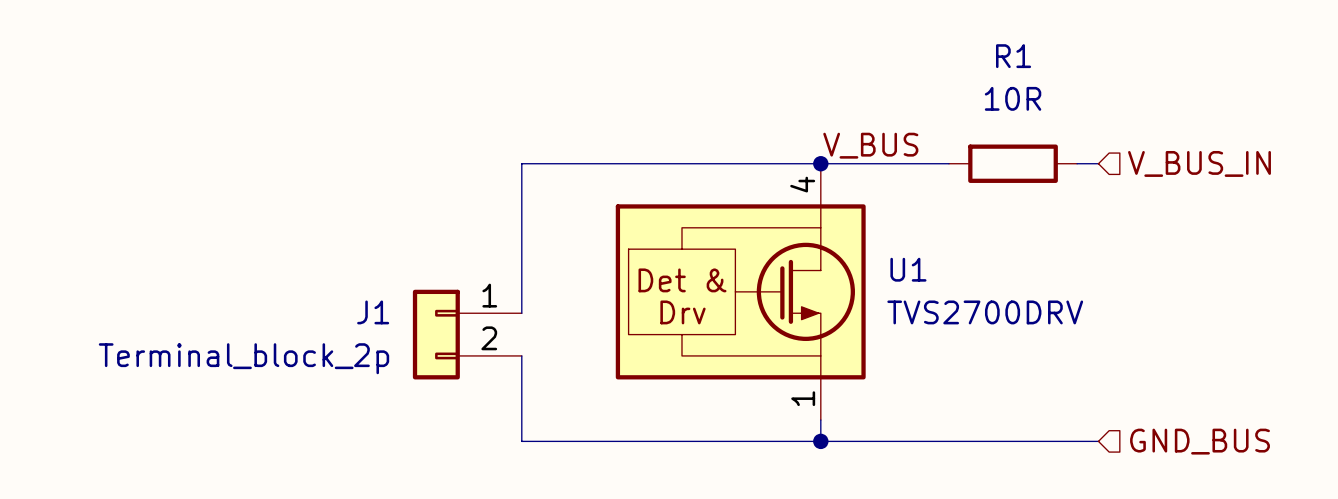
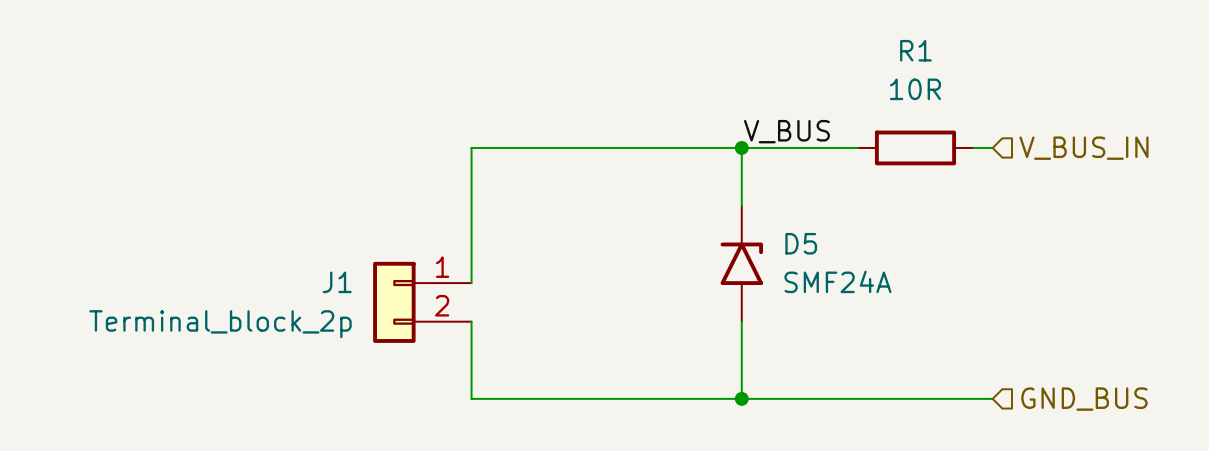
U1: TVS2700DRV (740, 291) -> none
D5: none -> SMF24A (741, 263)

